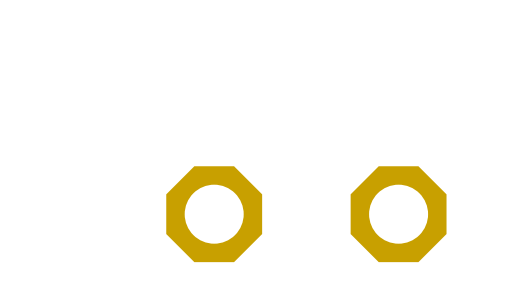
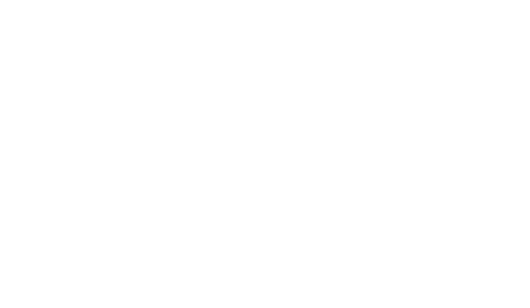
part: (306, 214) -> none

